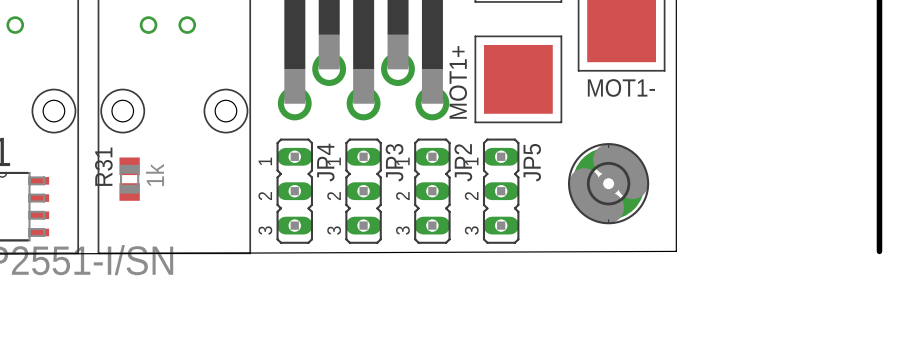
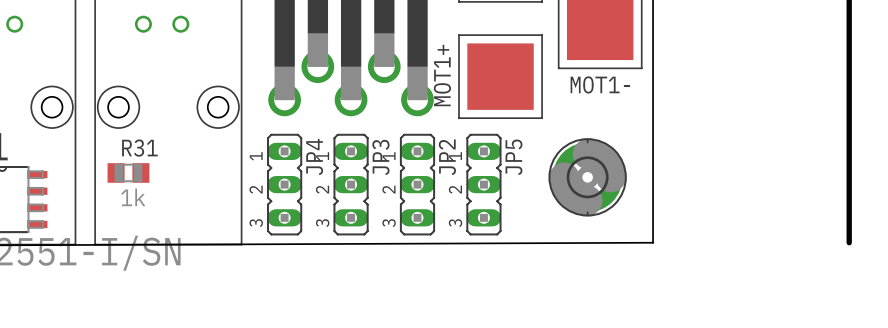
R31 rotation: 0° (129, 179) -> 90° clockwise (128, 172)

